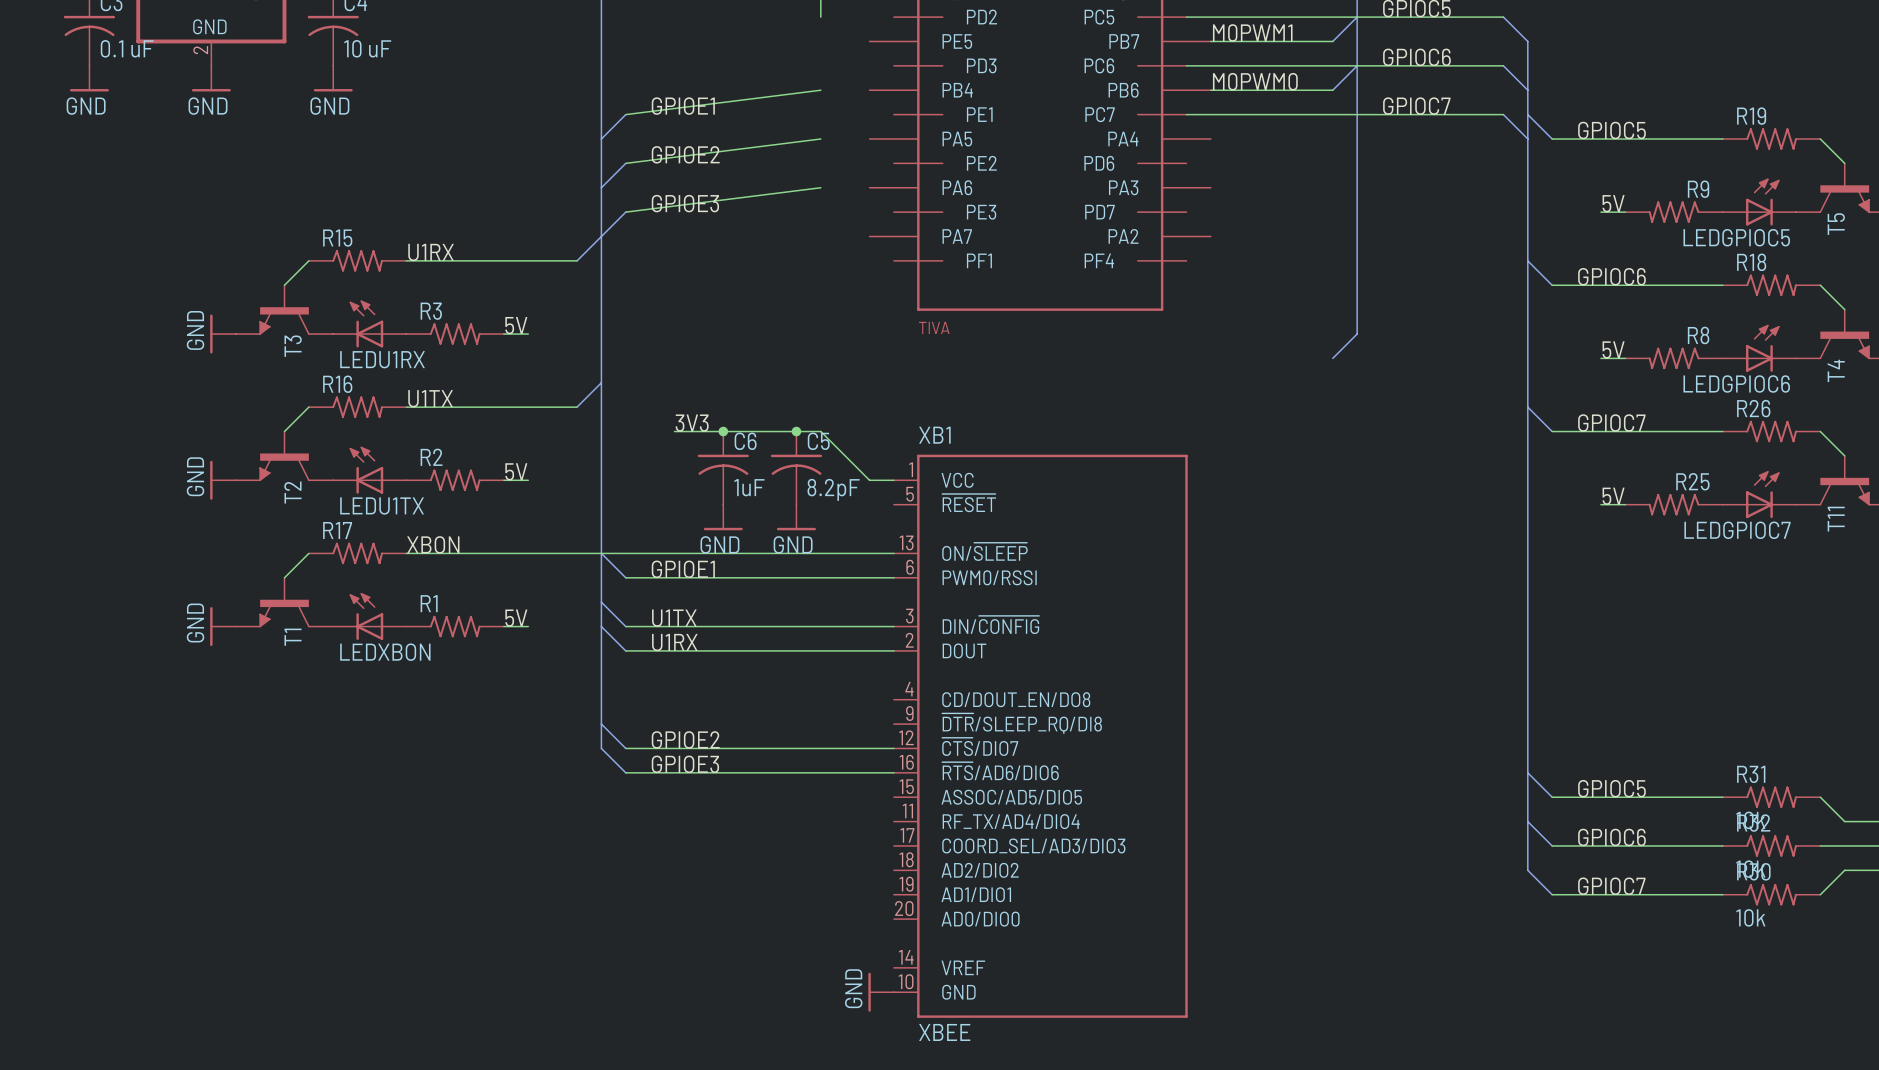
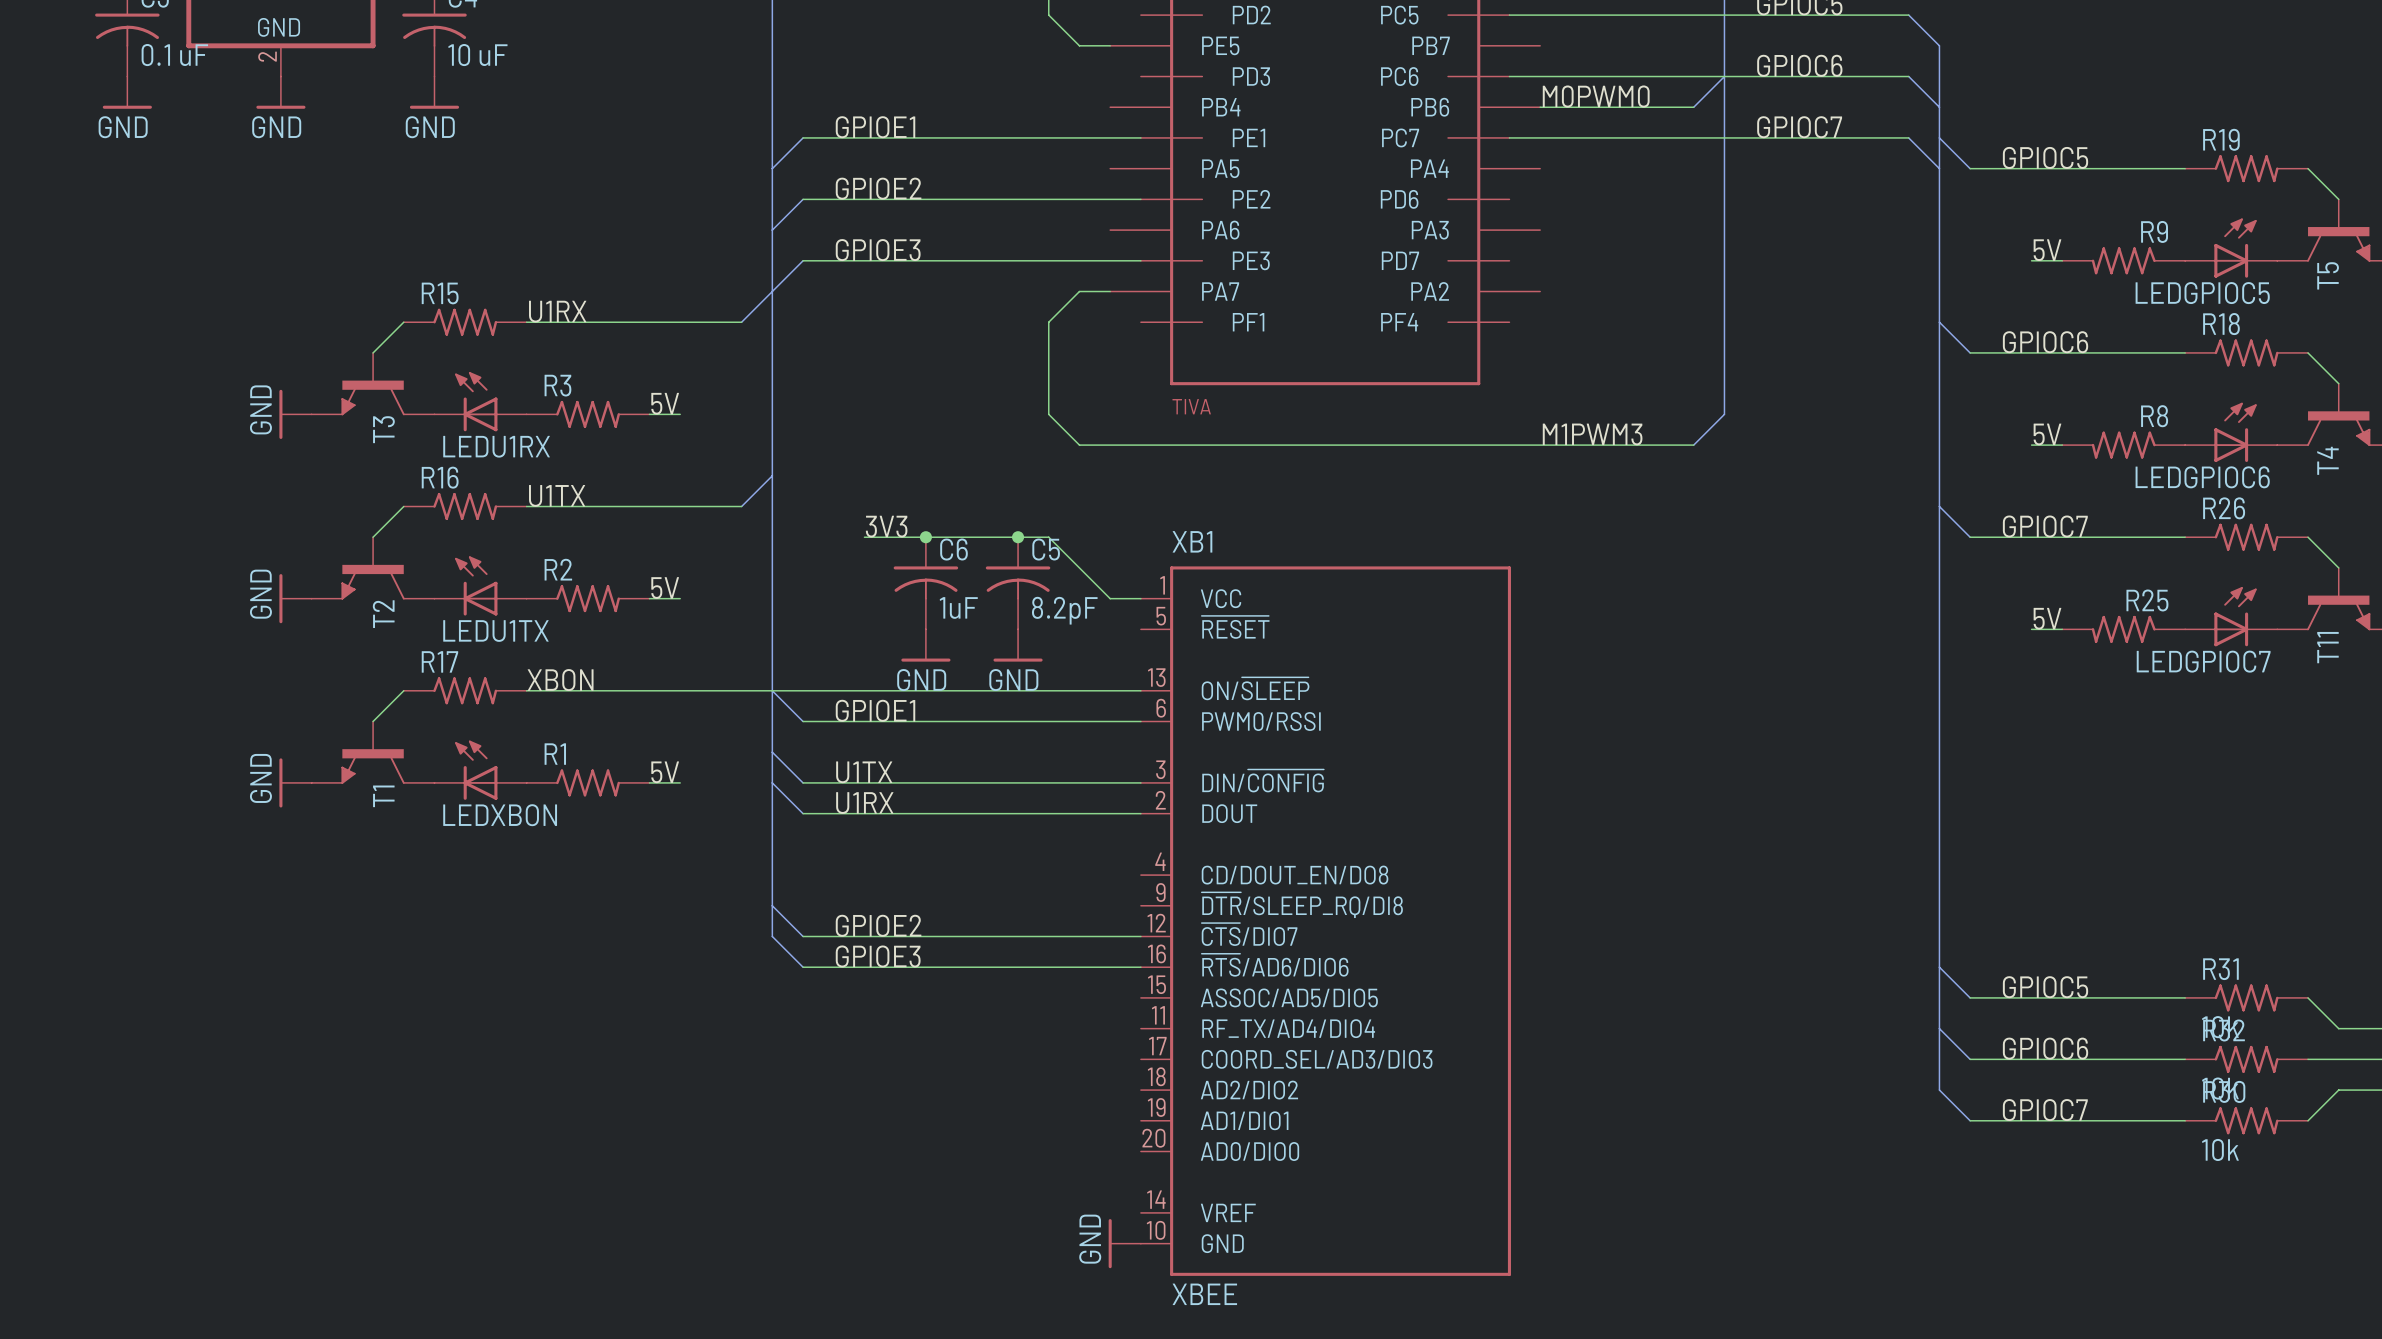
wire: none -> (1048, 15) (1079, 45) (1110, 45)
bus: (1357, 17) (1332, 41) -> none
label: M0PWM1 (1252, 32) -> none
wire: (1210, 41) (1332, 41) -> none
wire: (820, 90) (625, 114) -> (1140, 137) (803, 137)
wire: (820, 138) (625, 163) -> (1140, 199) (803, 199)
wire: (820, 187) (625, 212) -> (1140, 260) (803, 260)
wire: none -> (1110, 291) (1079, 291) (1048, 322) (1048, 414) (1079, 445) (1693, 445)
label: none -> M1PWM3 (1592, 434)

